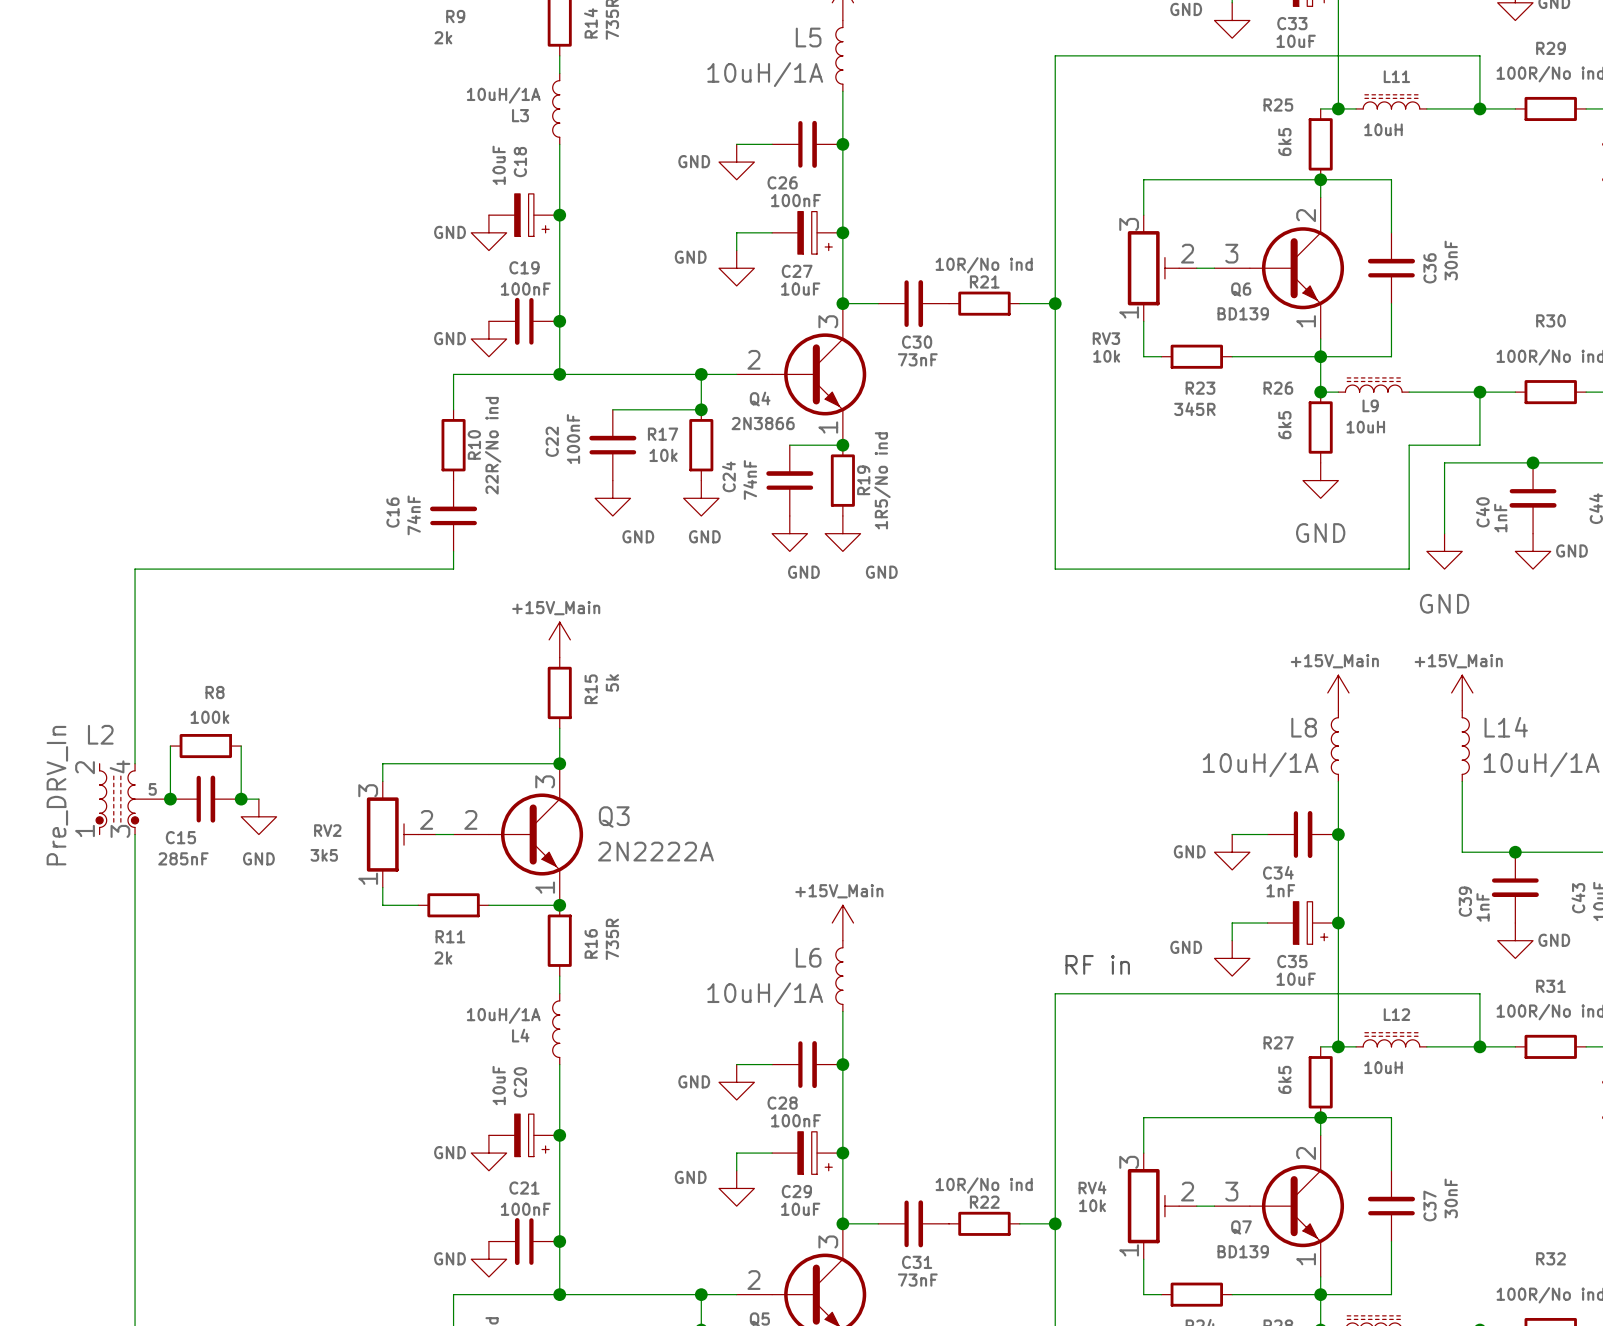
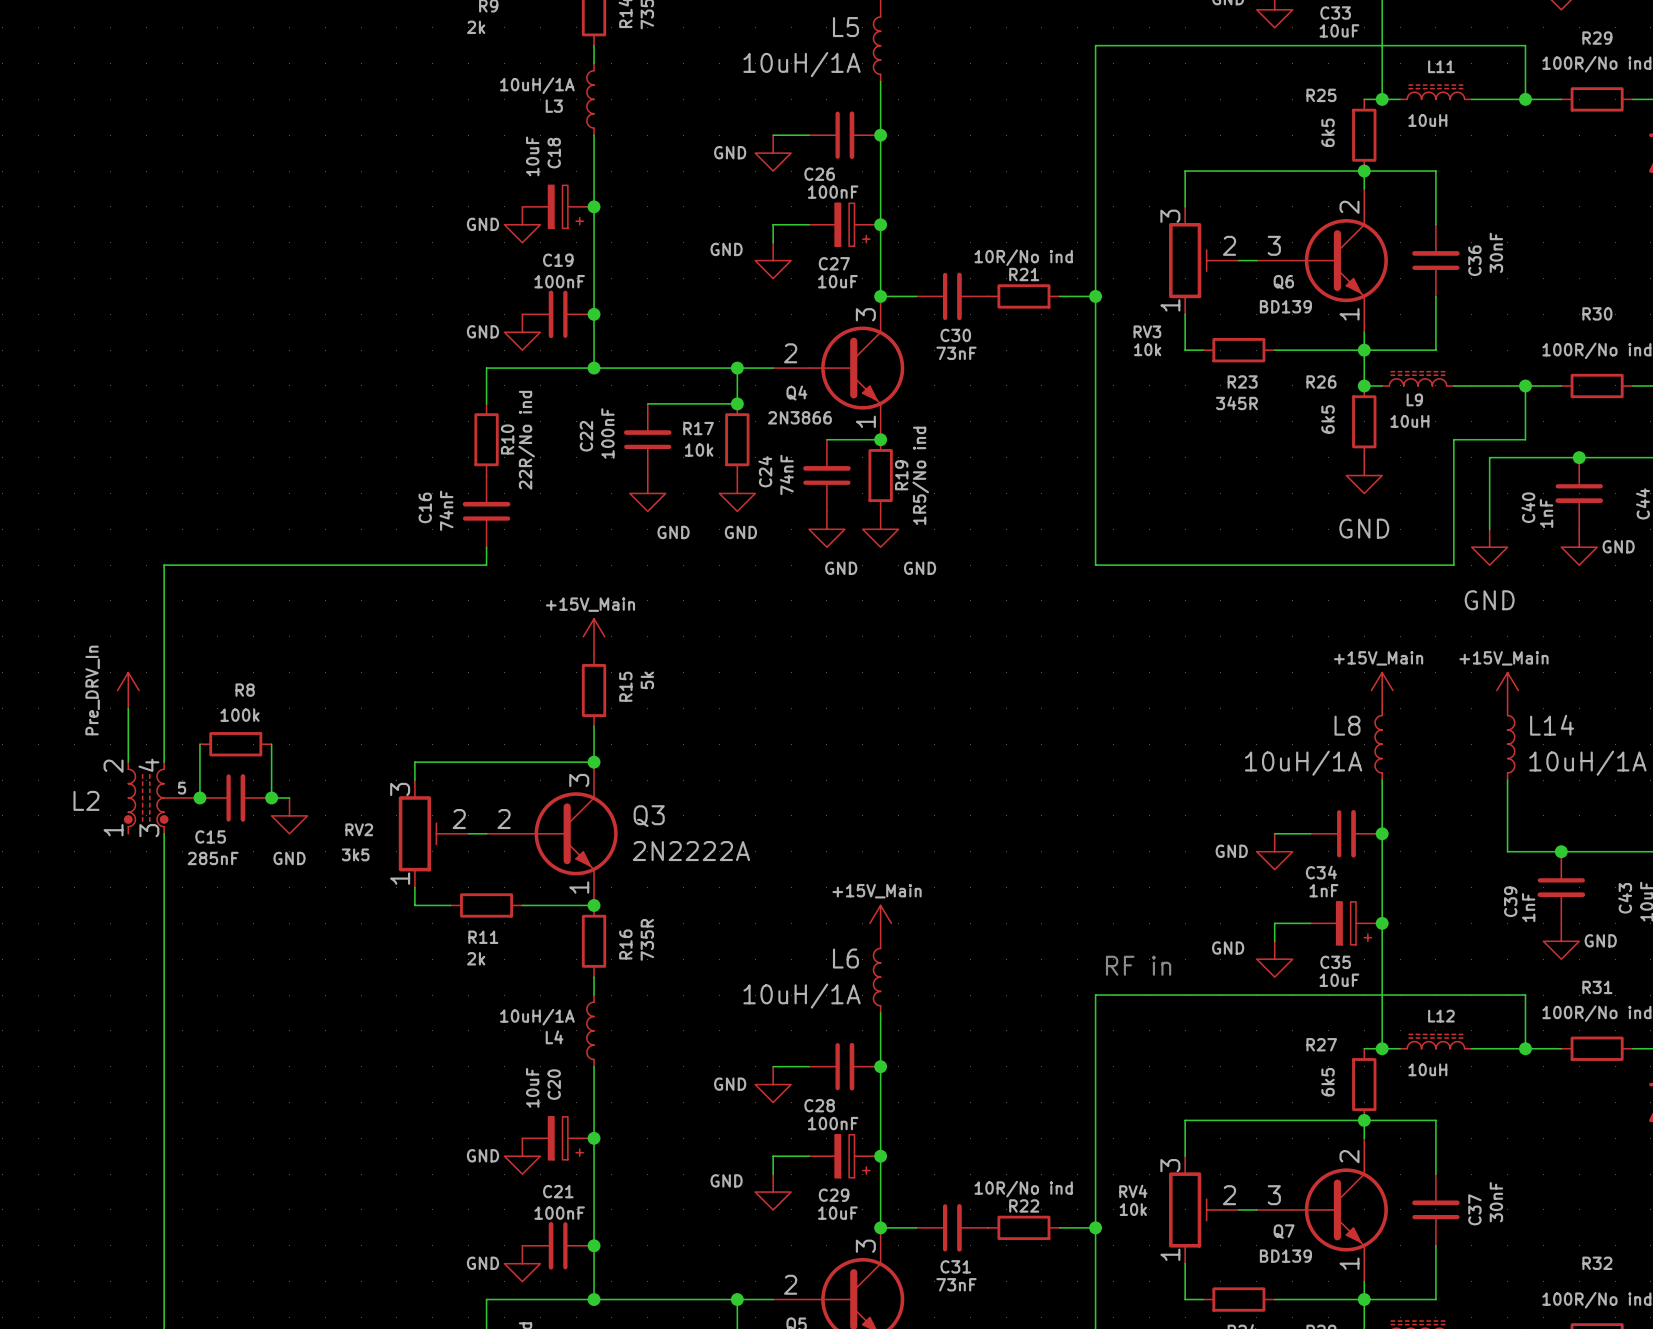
power symbol: none -> Pre_DRV_In (128, 690)
wire: none -> (128, 708) (128, 762)
L2 name position: L2 (100, 734) -> L2 (86, 800)
L2 value: Pre_DRV_In (57, 795) -> none

